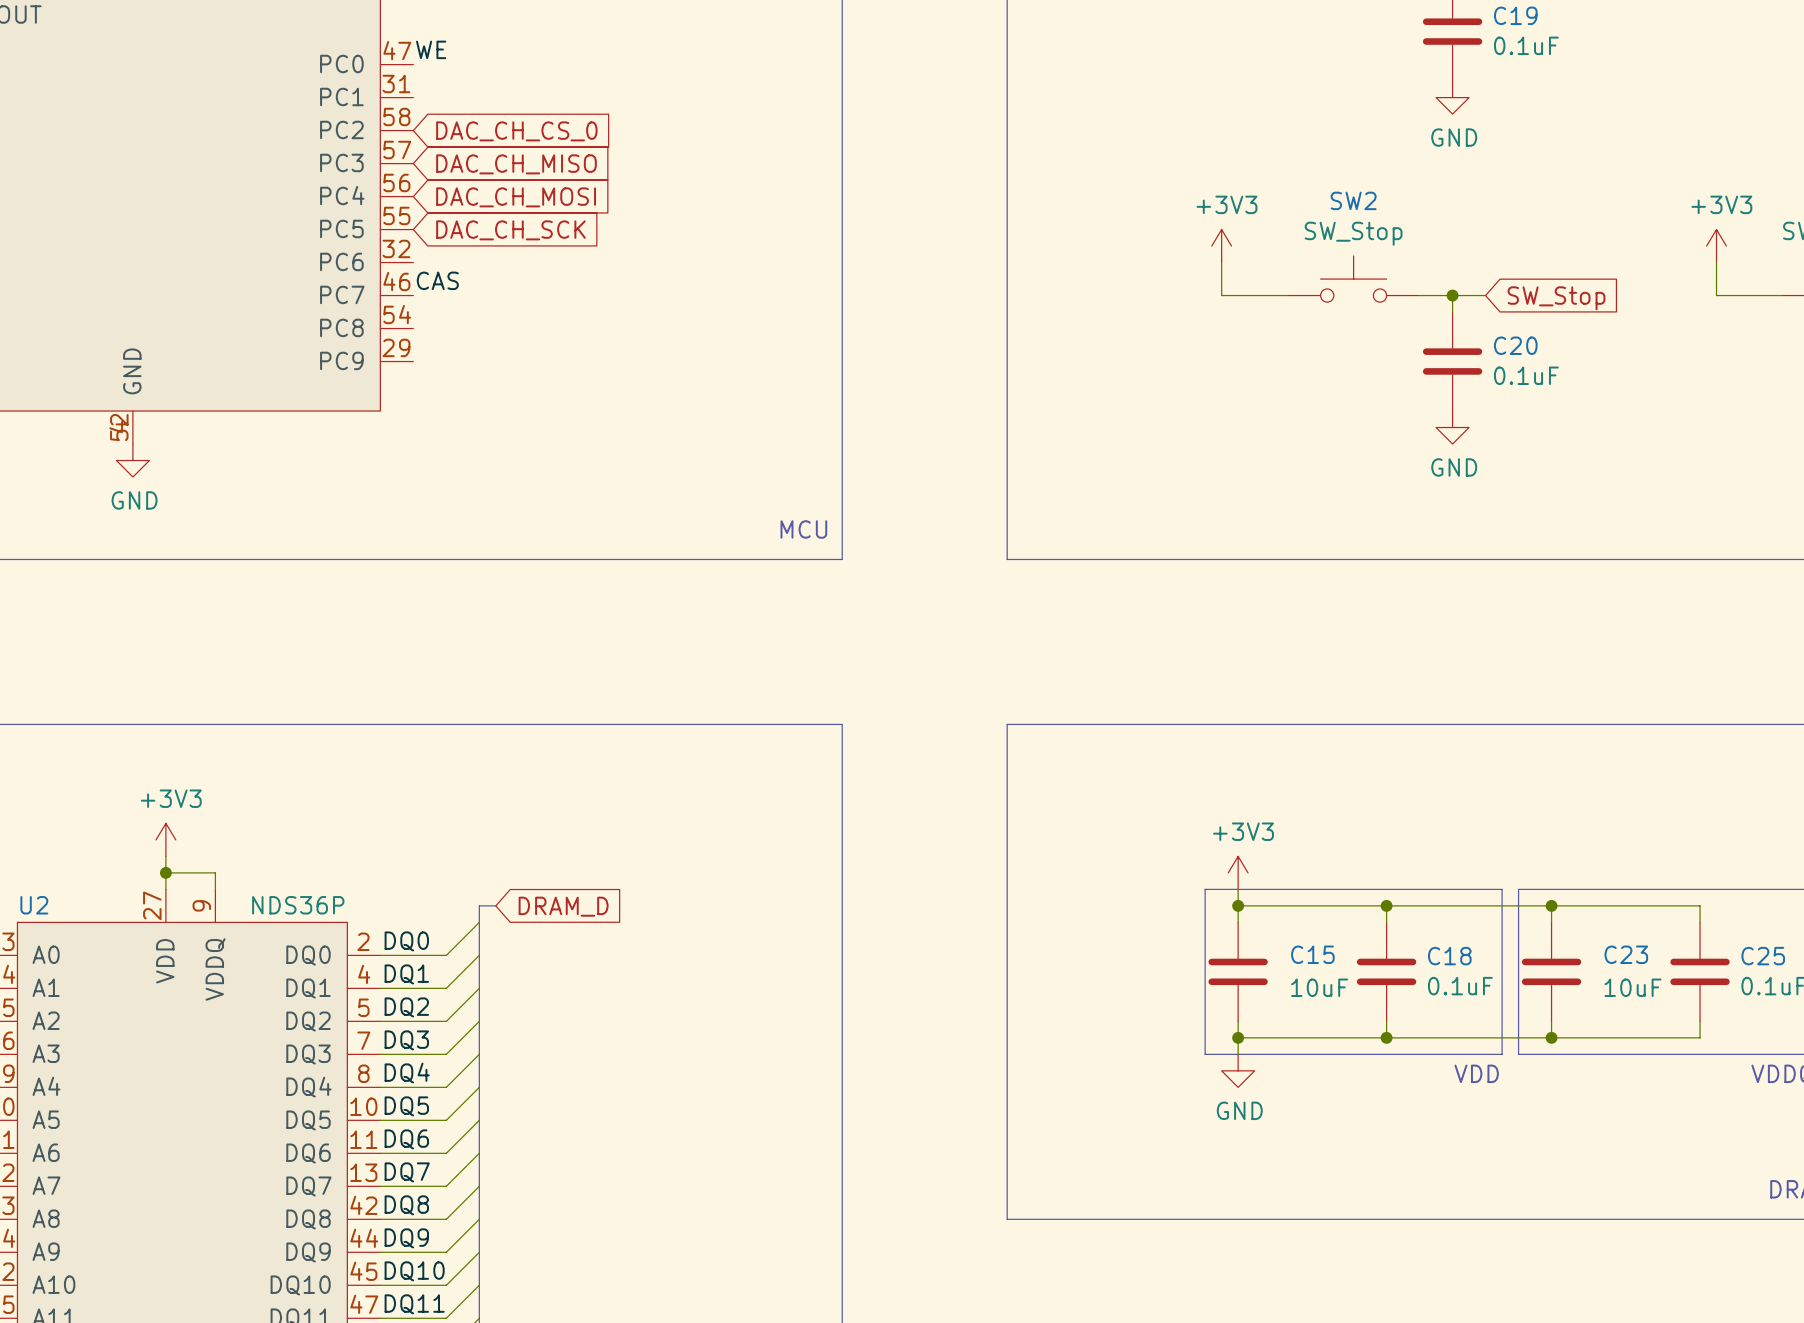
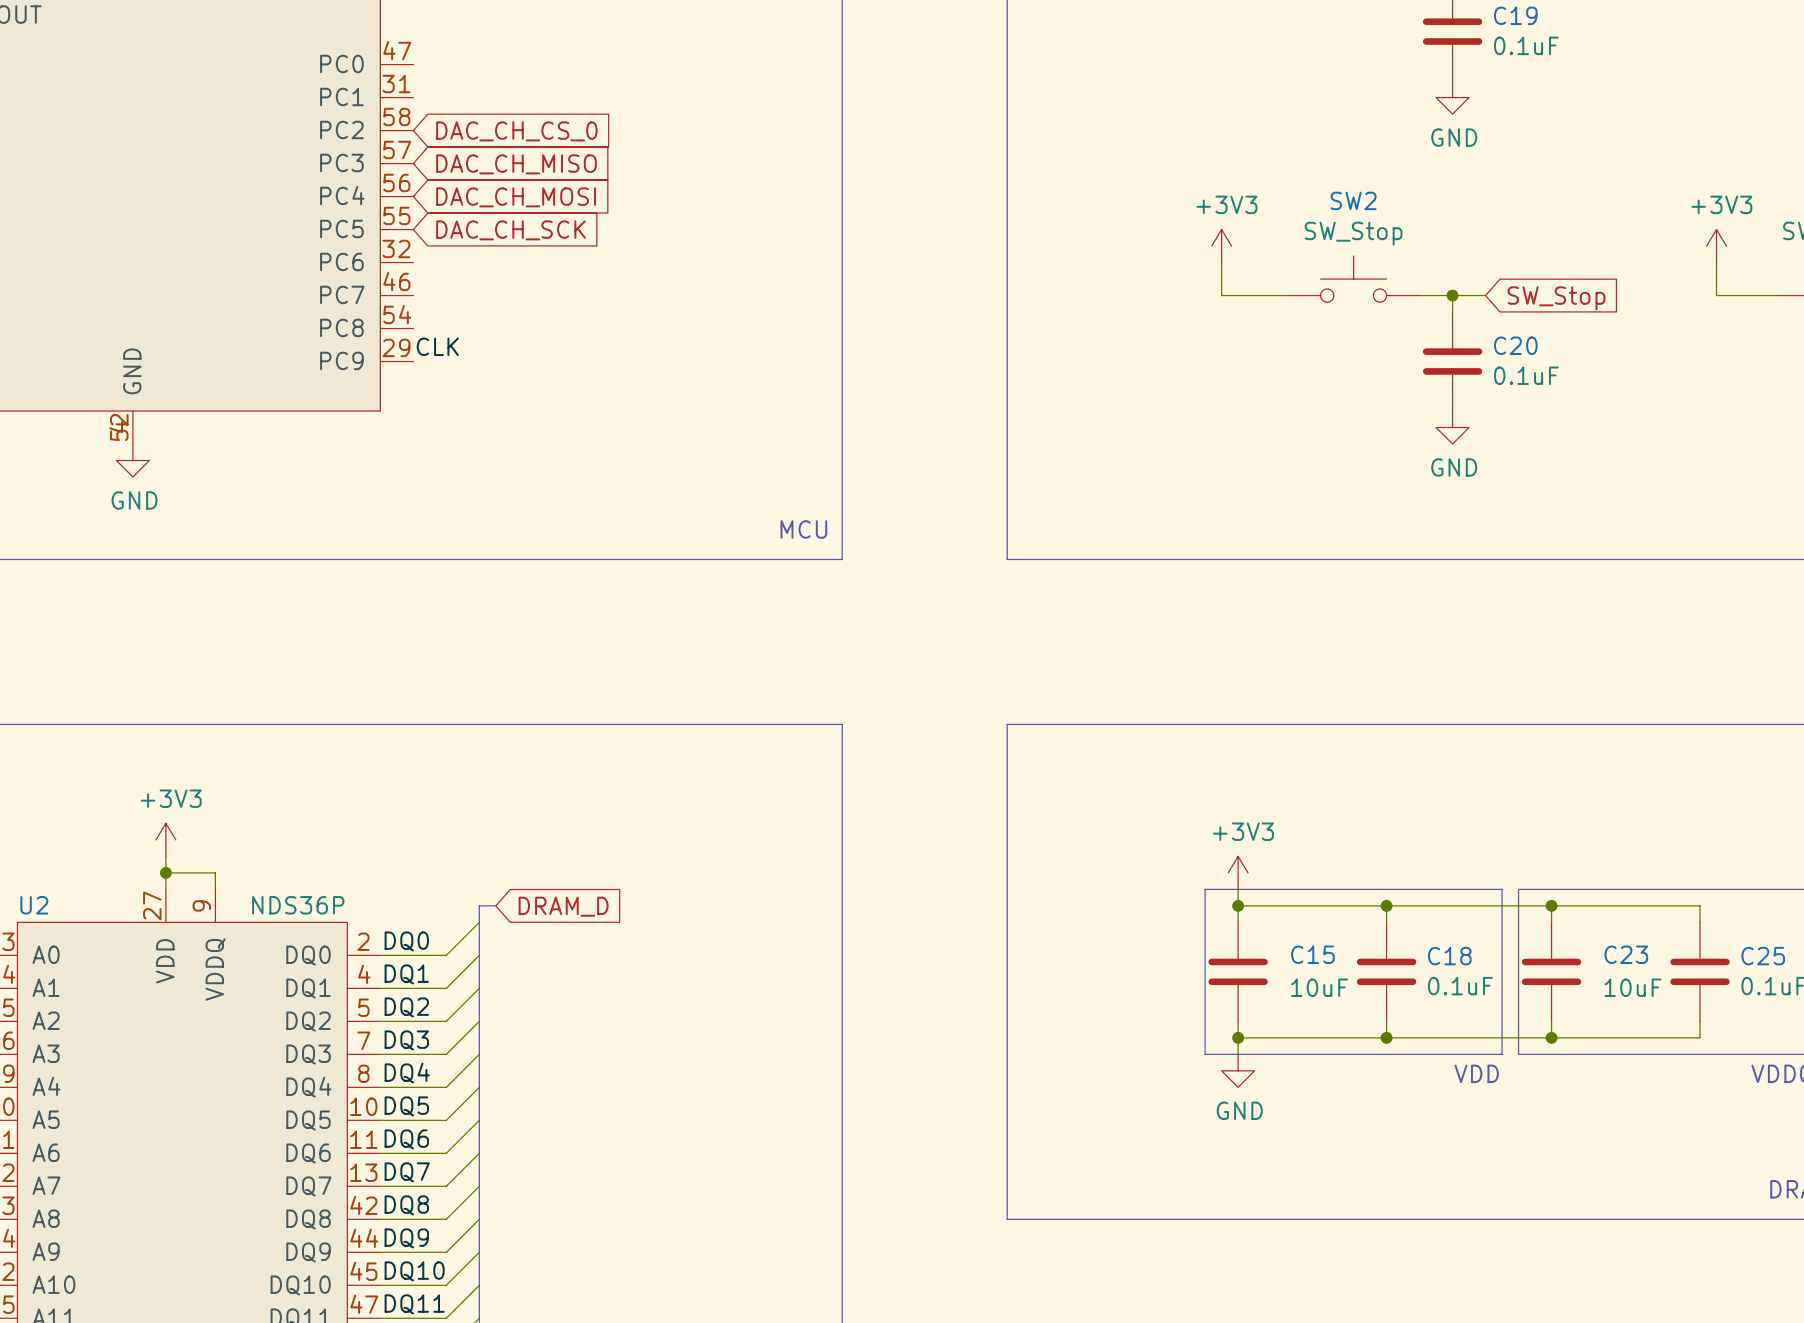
label: WE (431, 49) -> none
label: CAS (437, 280) -> none
label: none -> CLK (437, 346)

